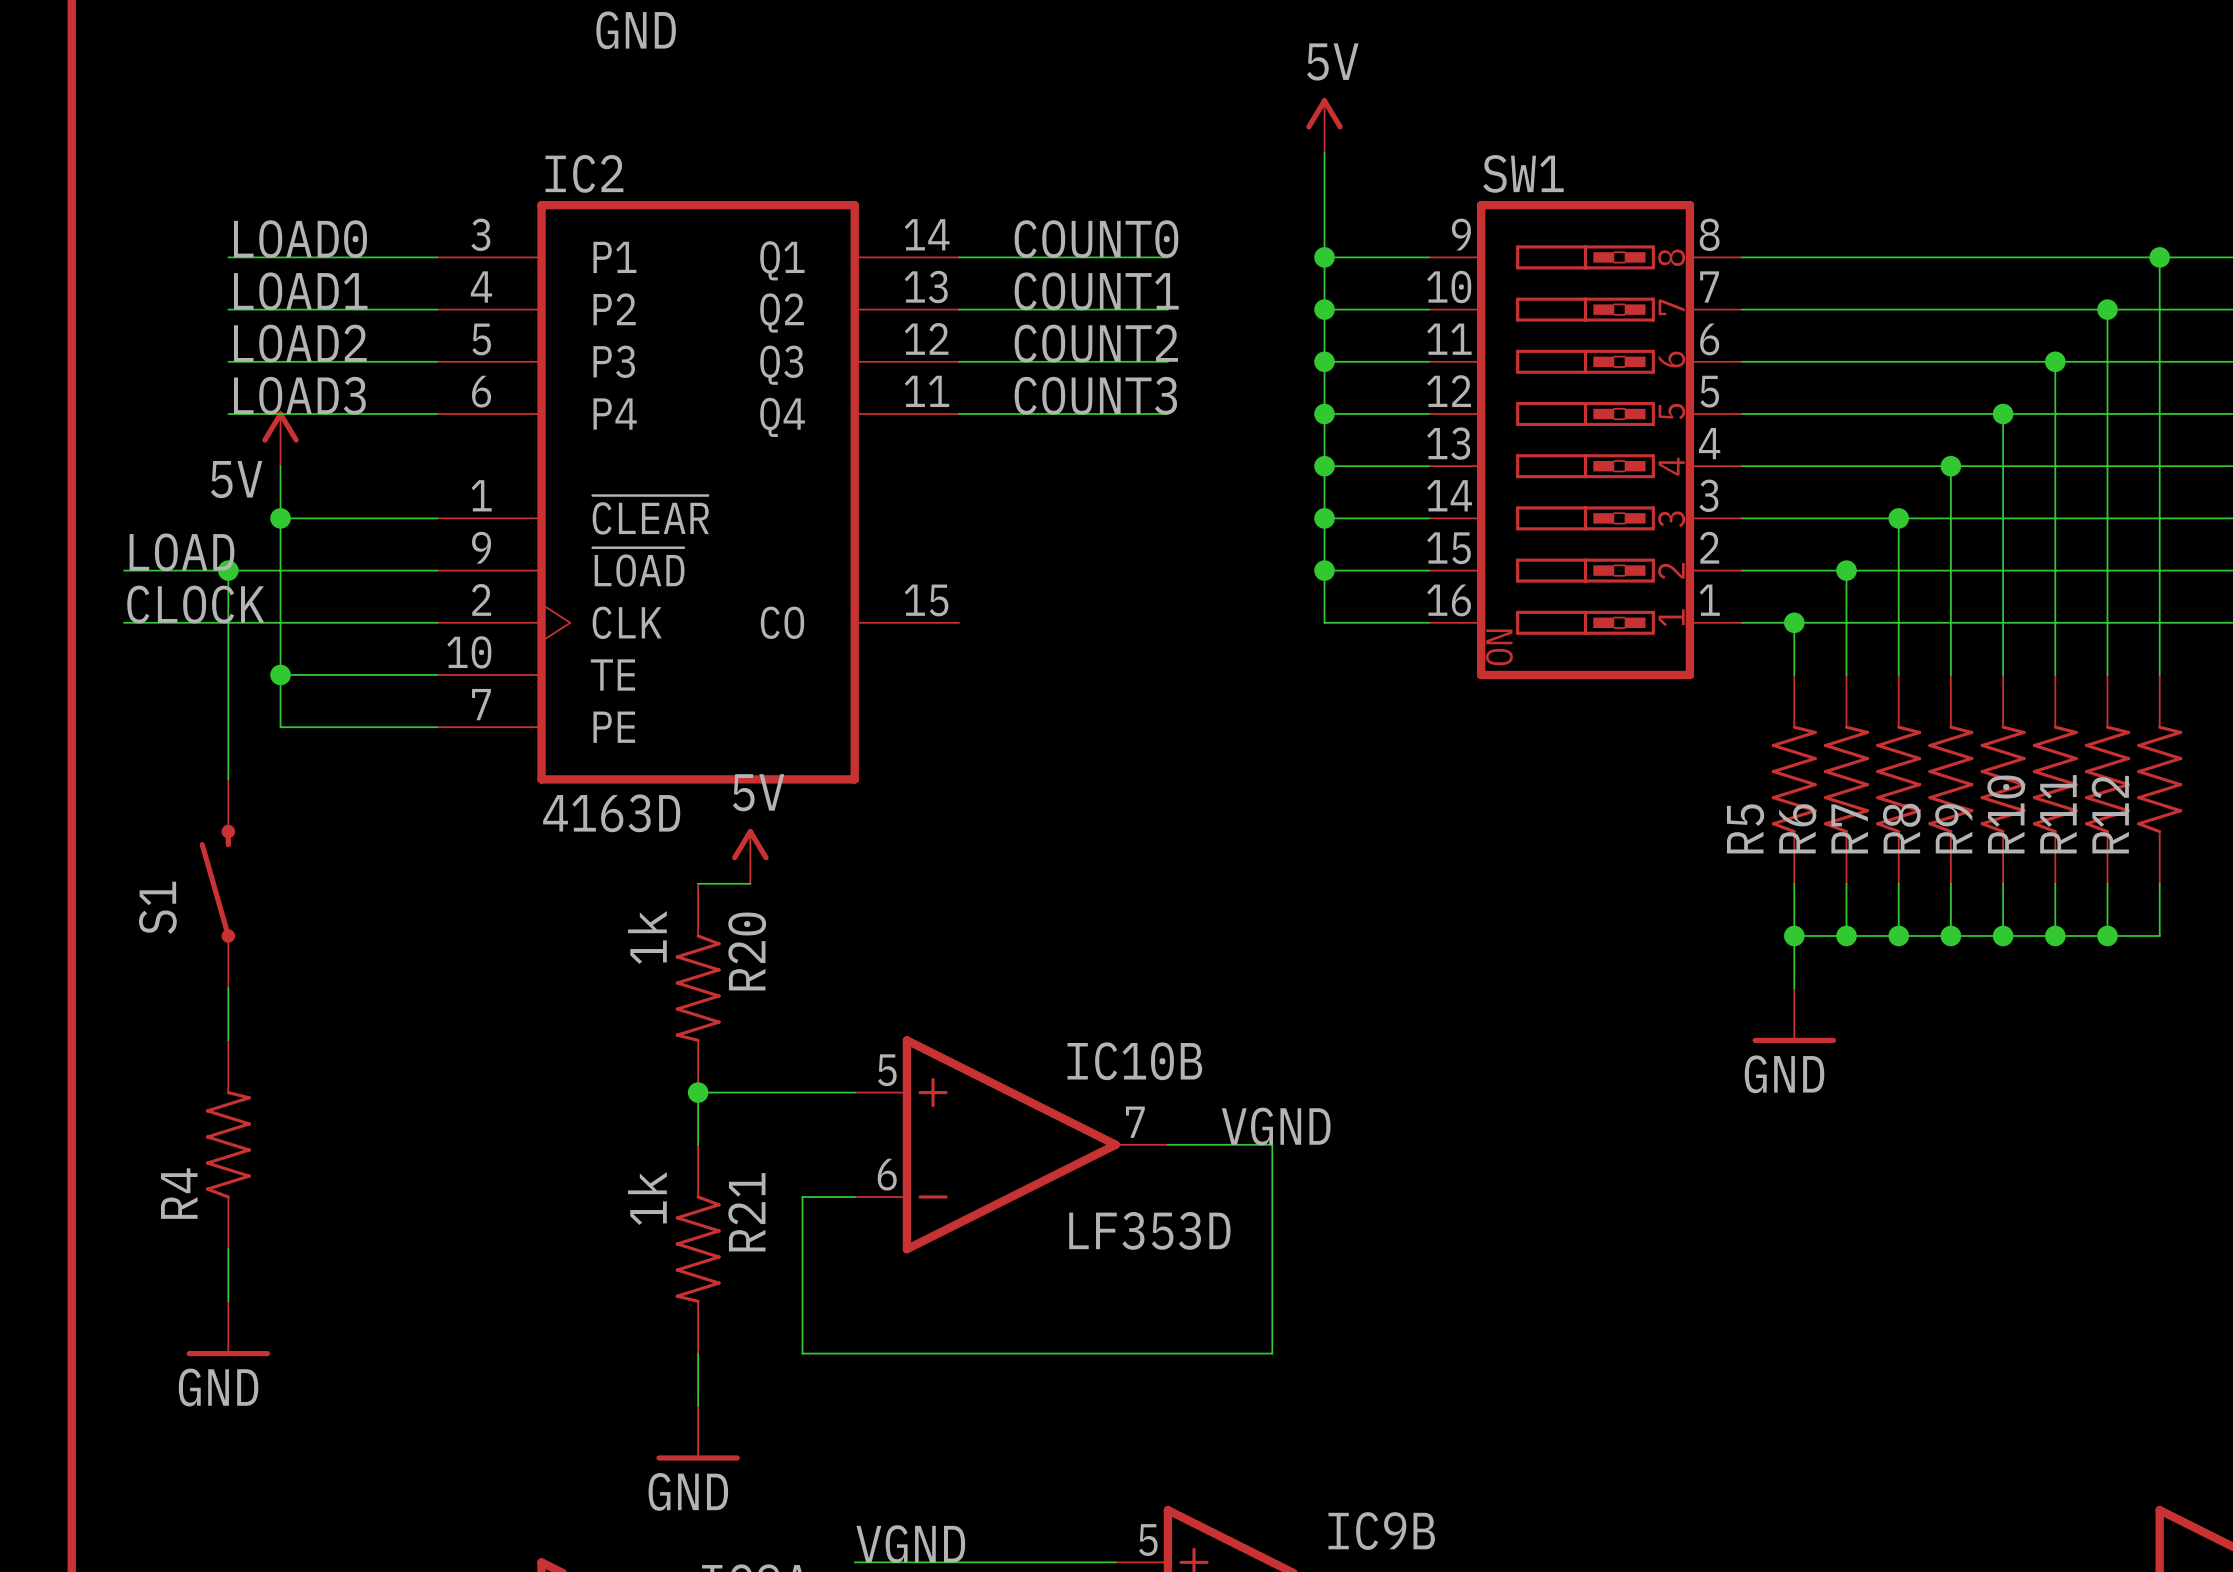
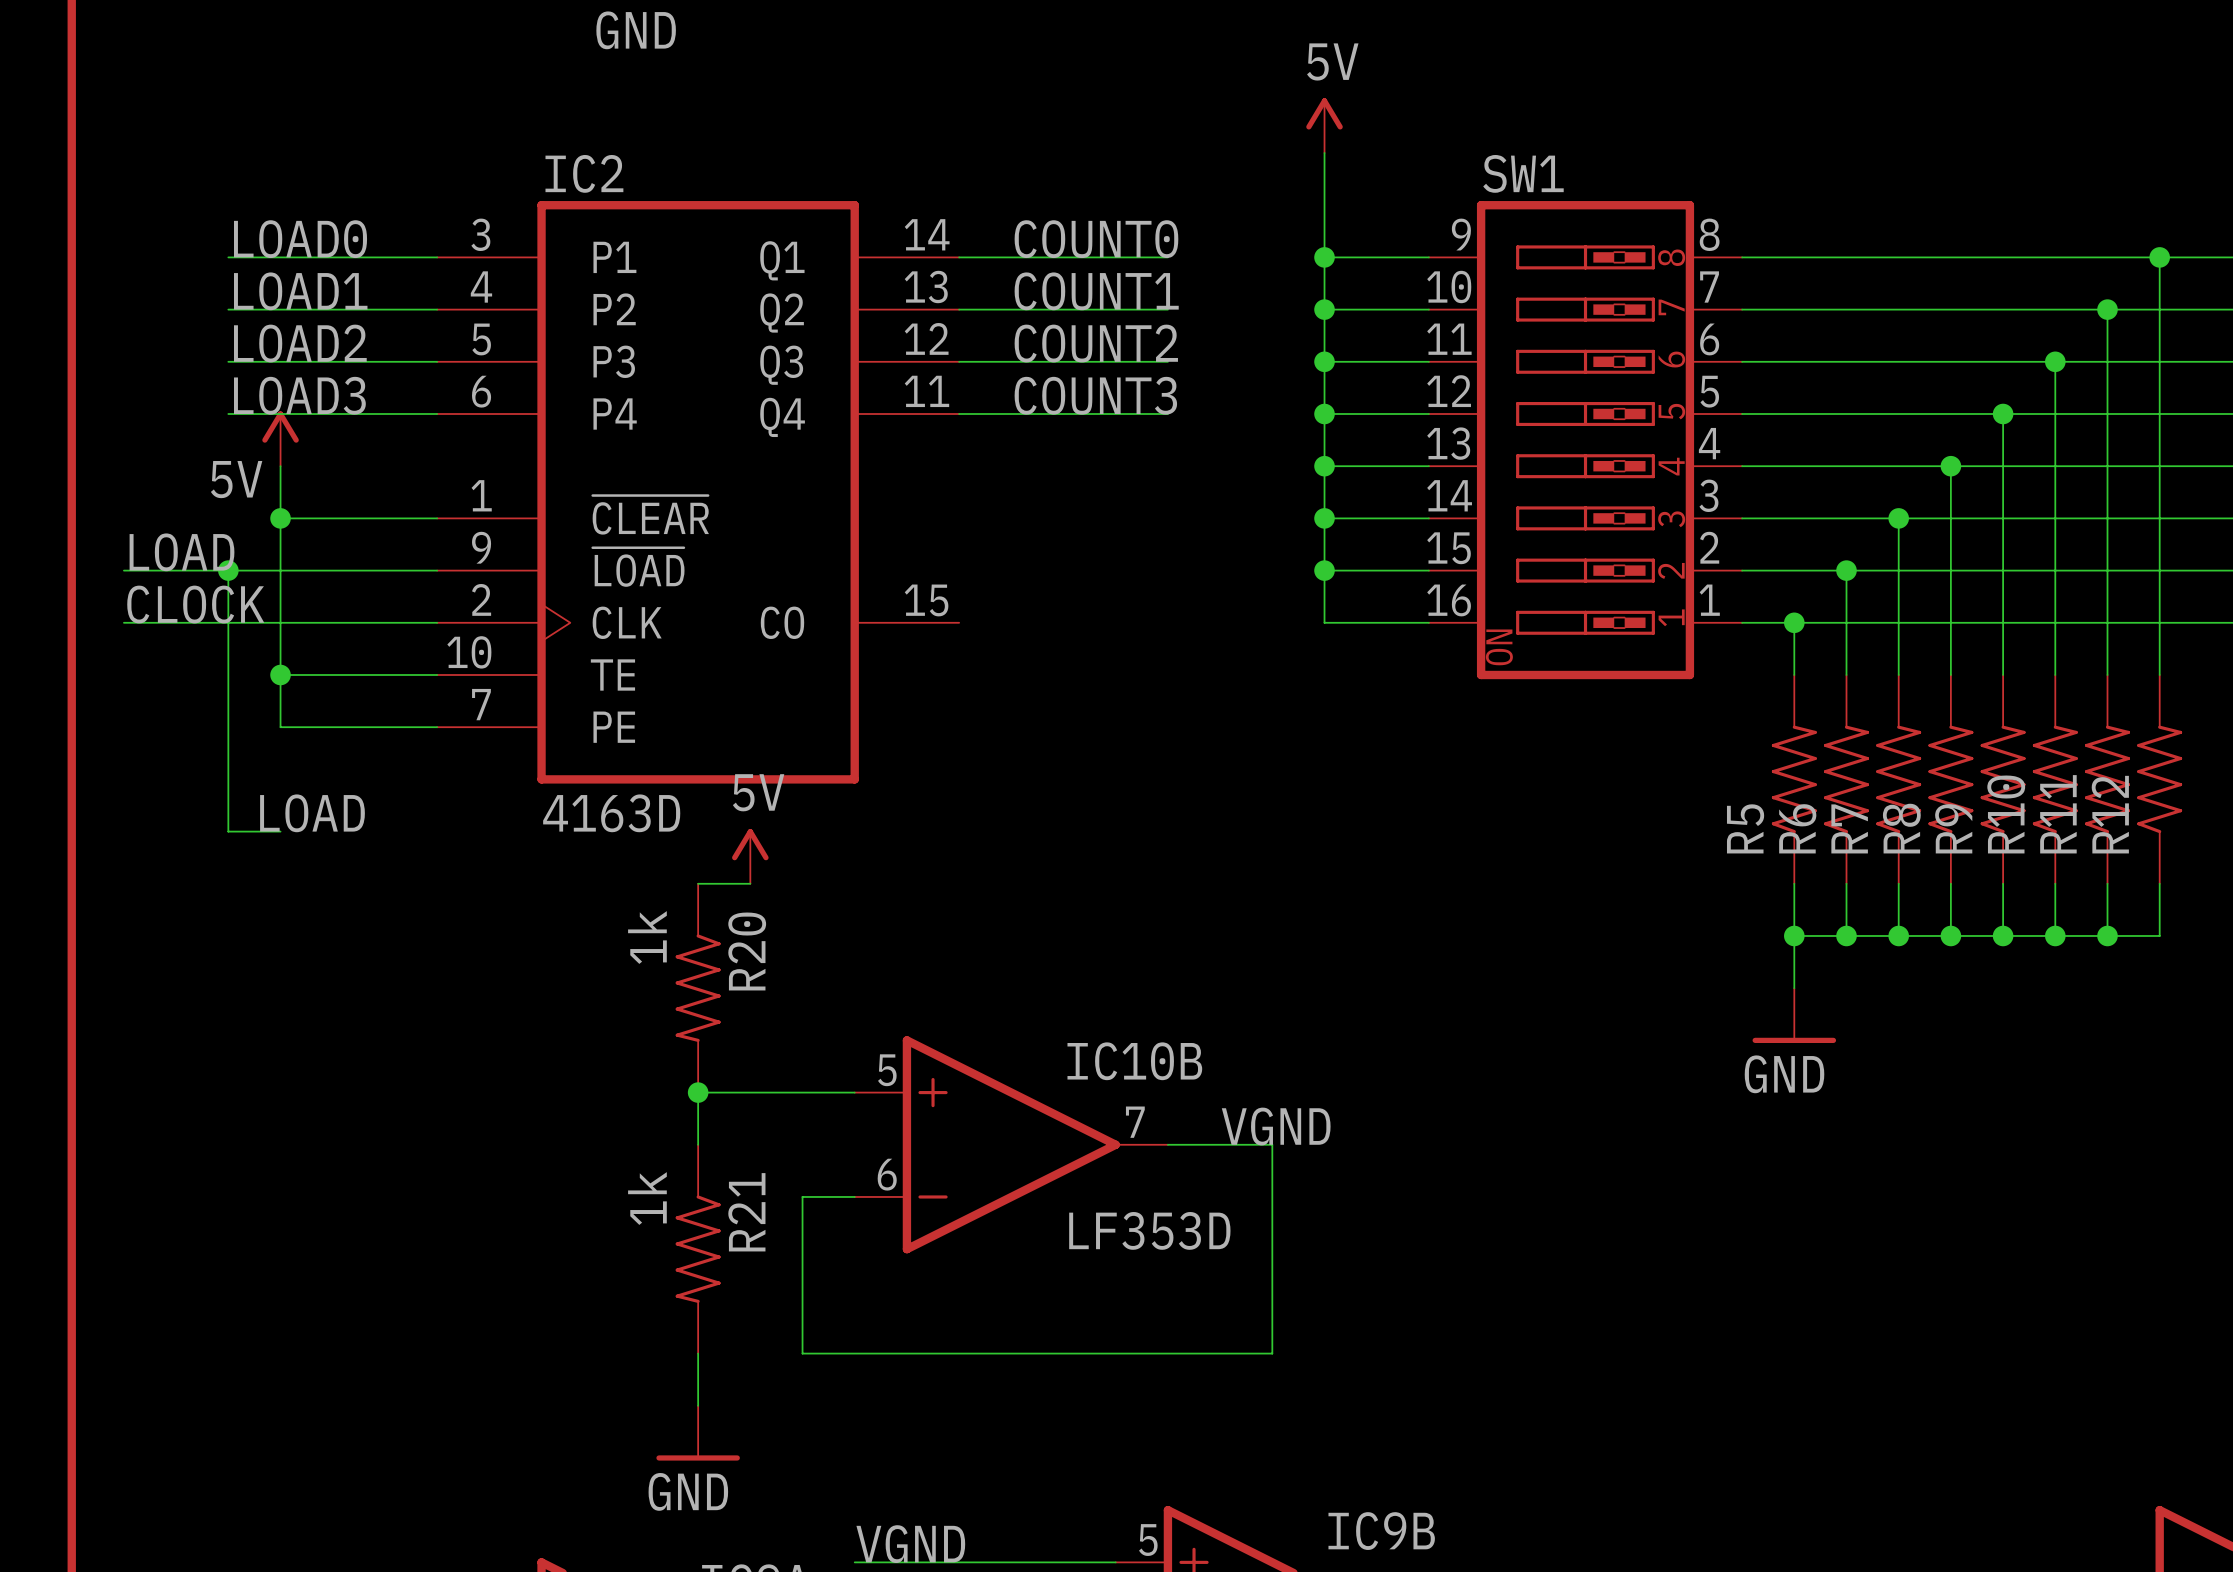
wire: none -> (228, 779) (228, 831) (280, 831)
label: none -> LOAD (312, 813)
S1: (217, 883) -> none
wire: (228, 988) (228, 1040) -> none
R4: (228, 1144) -> none
wire: (228, 1249) (228, 1301) -> none
power symbol: GND (228, 1328) -> none

